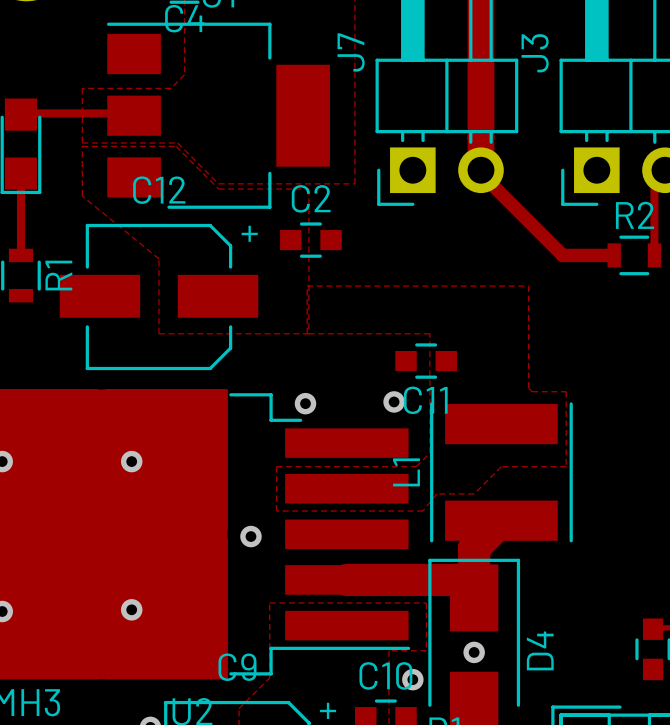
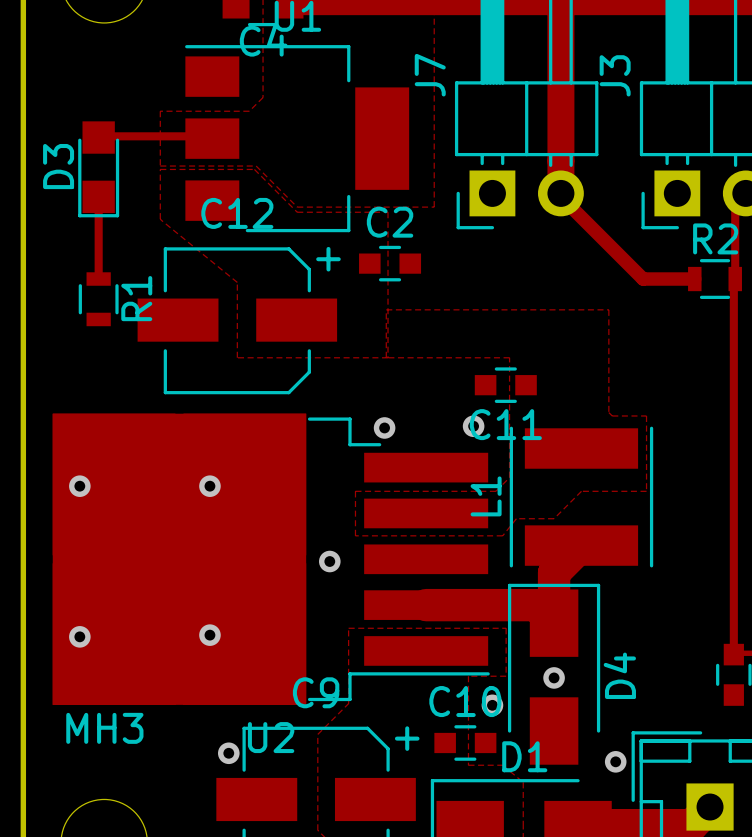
top track: none -> (735, 279) (733, 654)

